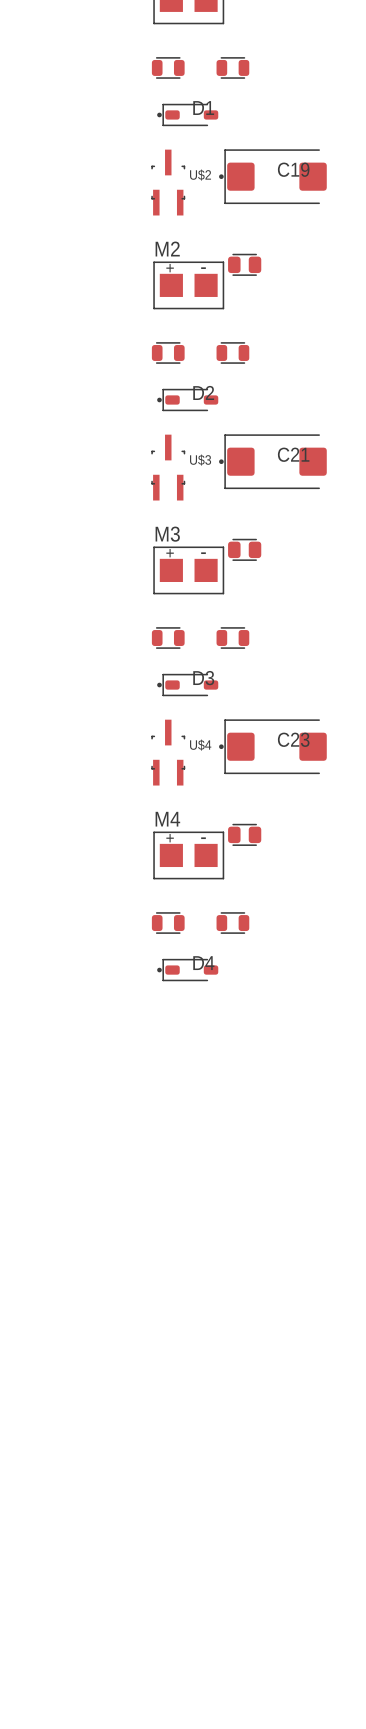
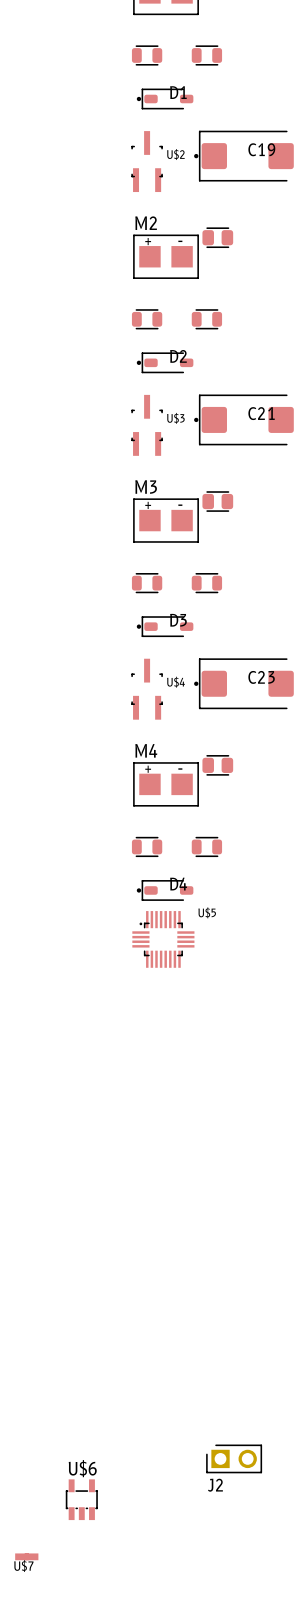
U$5: none -> (163, 939)
J2: none -> (234, 1458)
U$6: none -> (81, 1499)
U$7: none -> (26, 1556)

